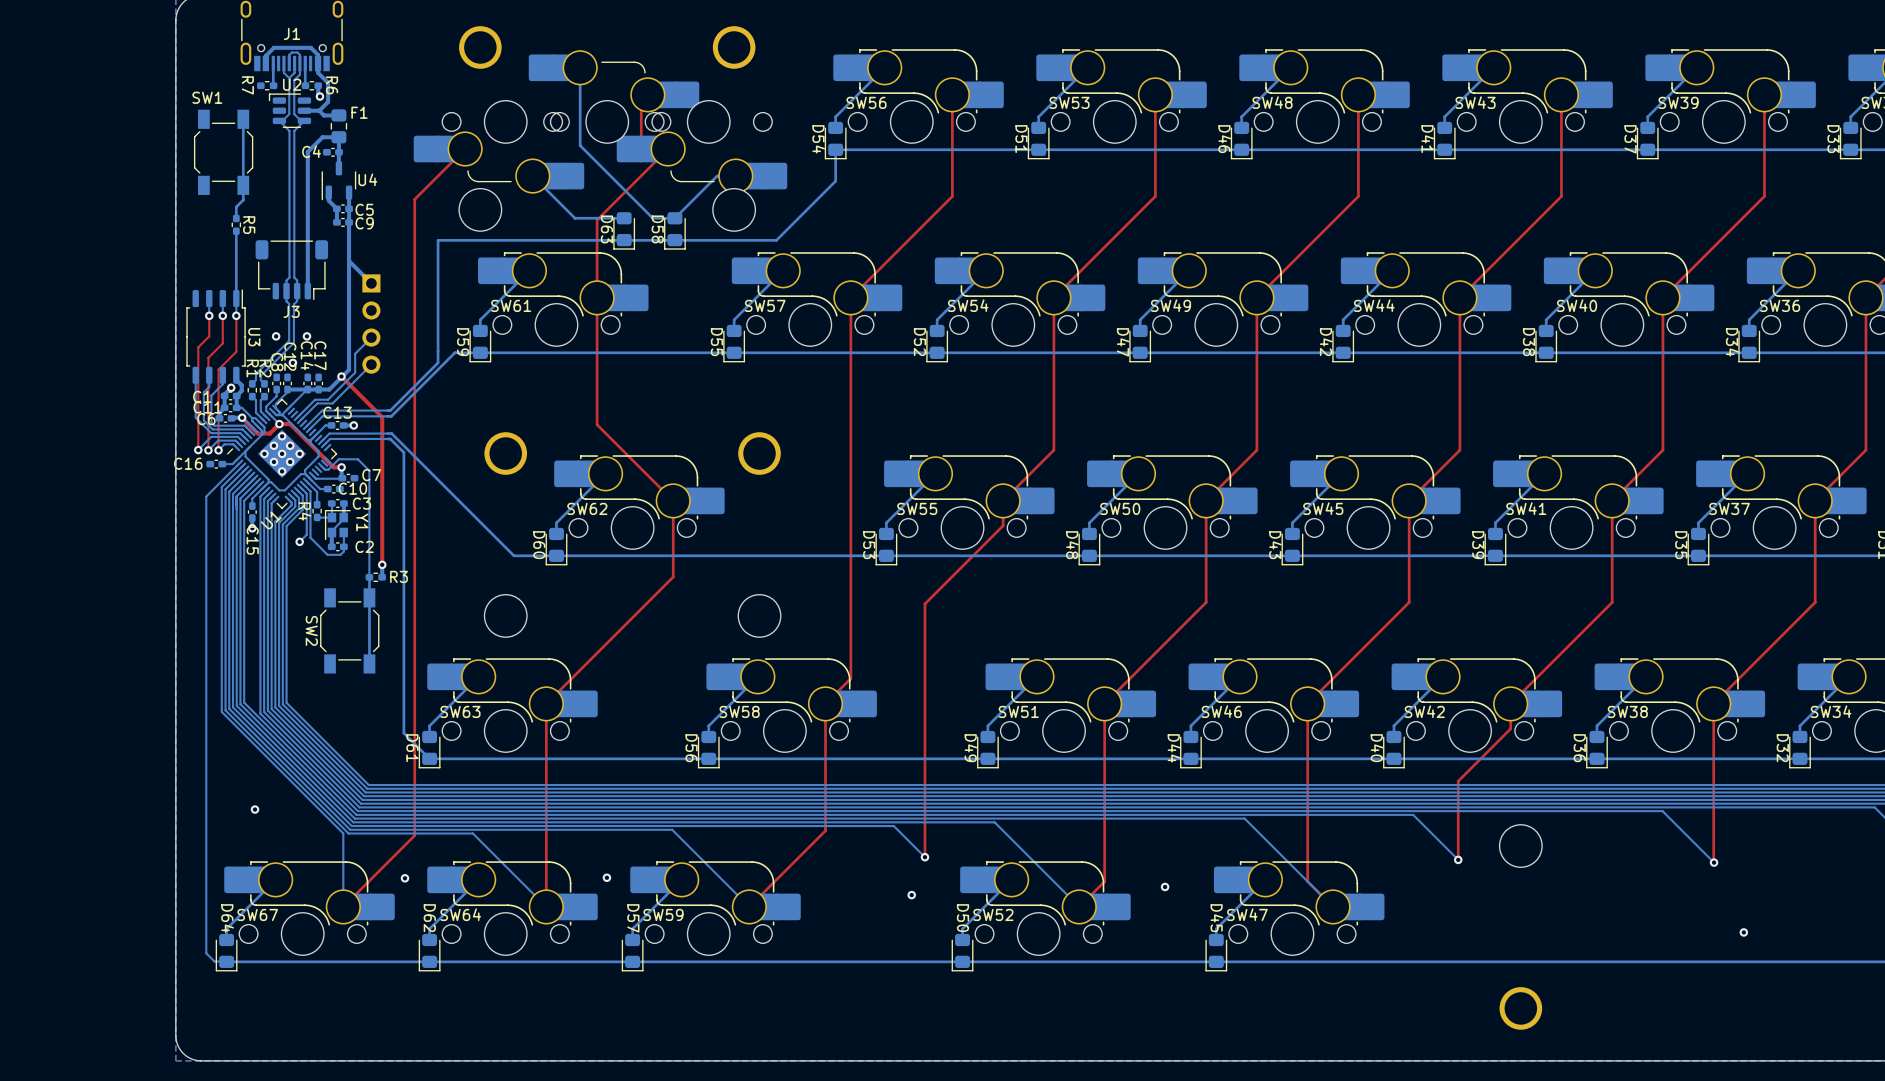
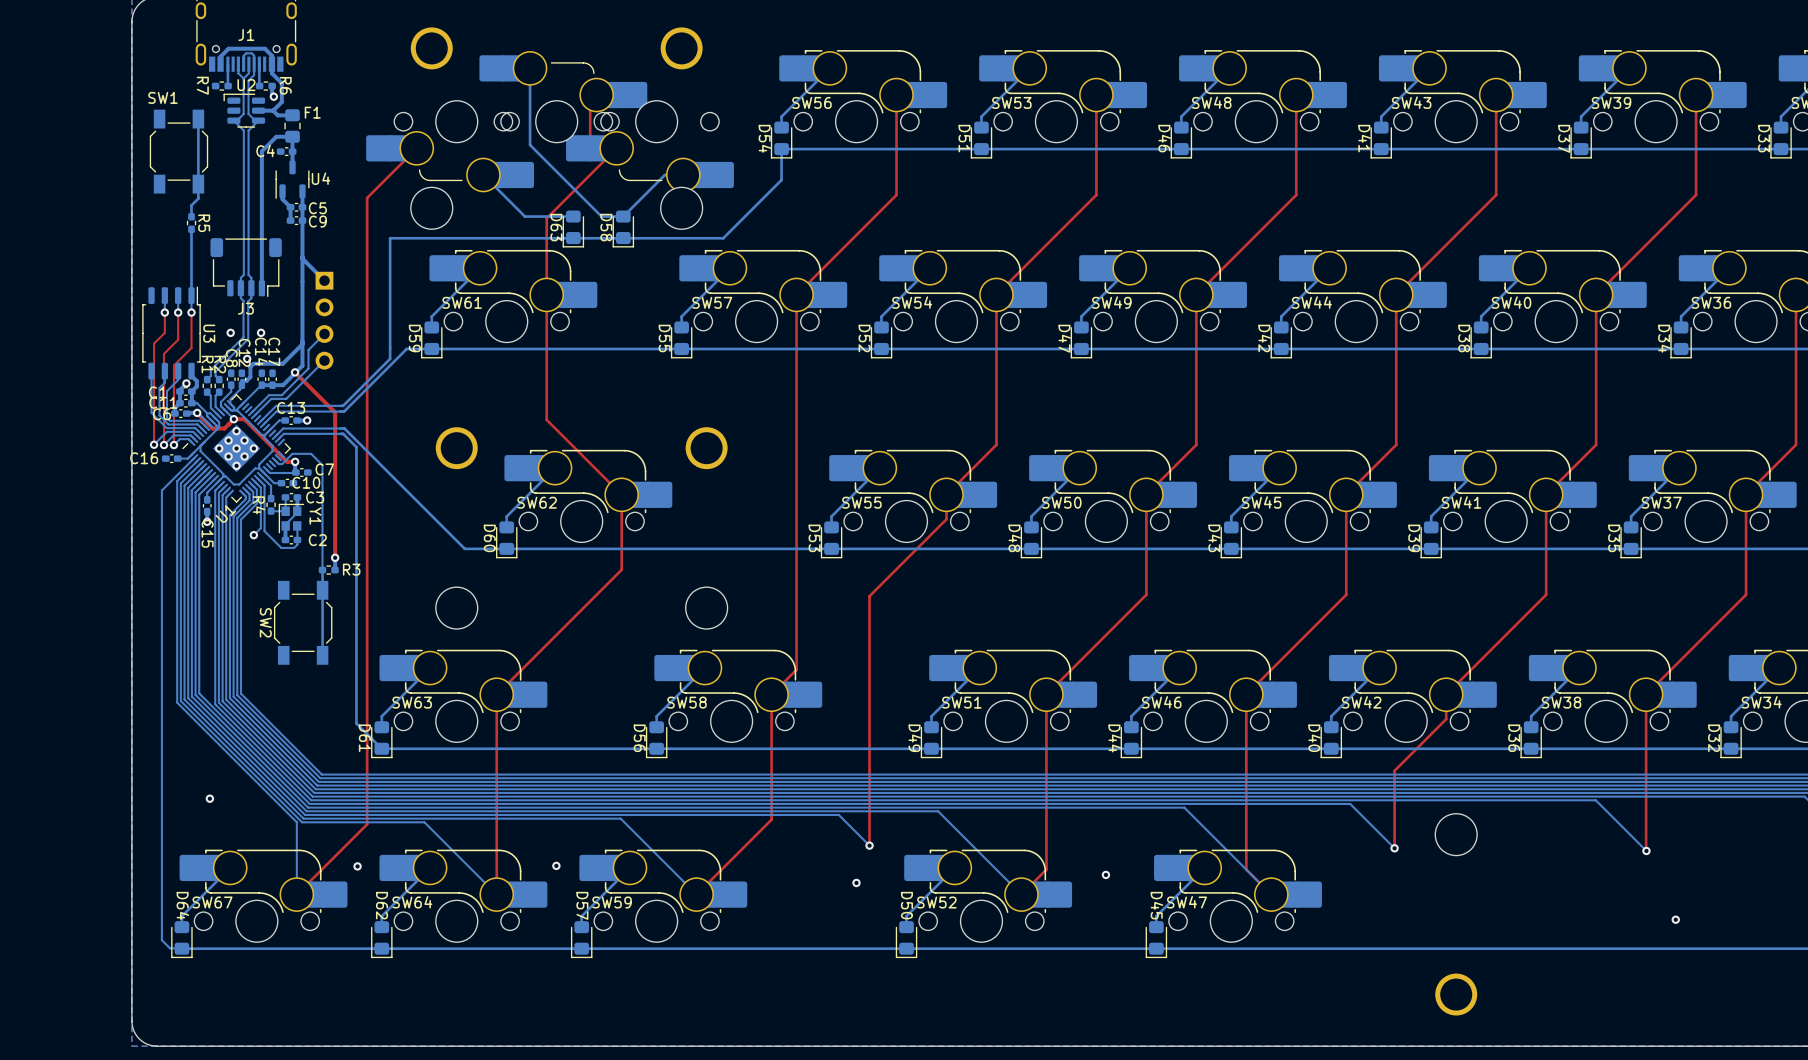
bottom track: (307, 389) (287, 389) -> (302, 344) (282, 363) (253, 363) (250, 366) (250, 377) (246, 380) (241, 380) (241, 385)

